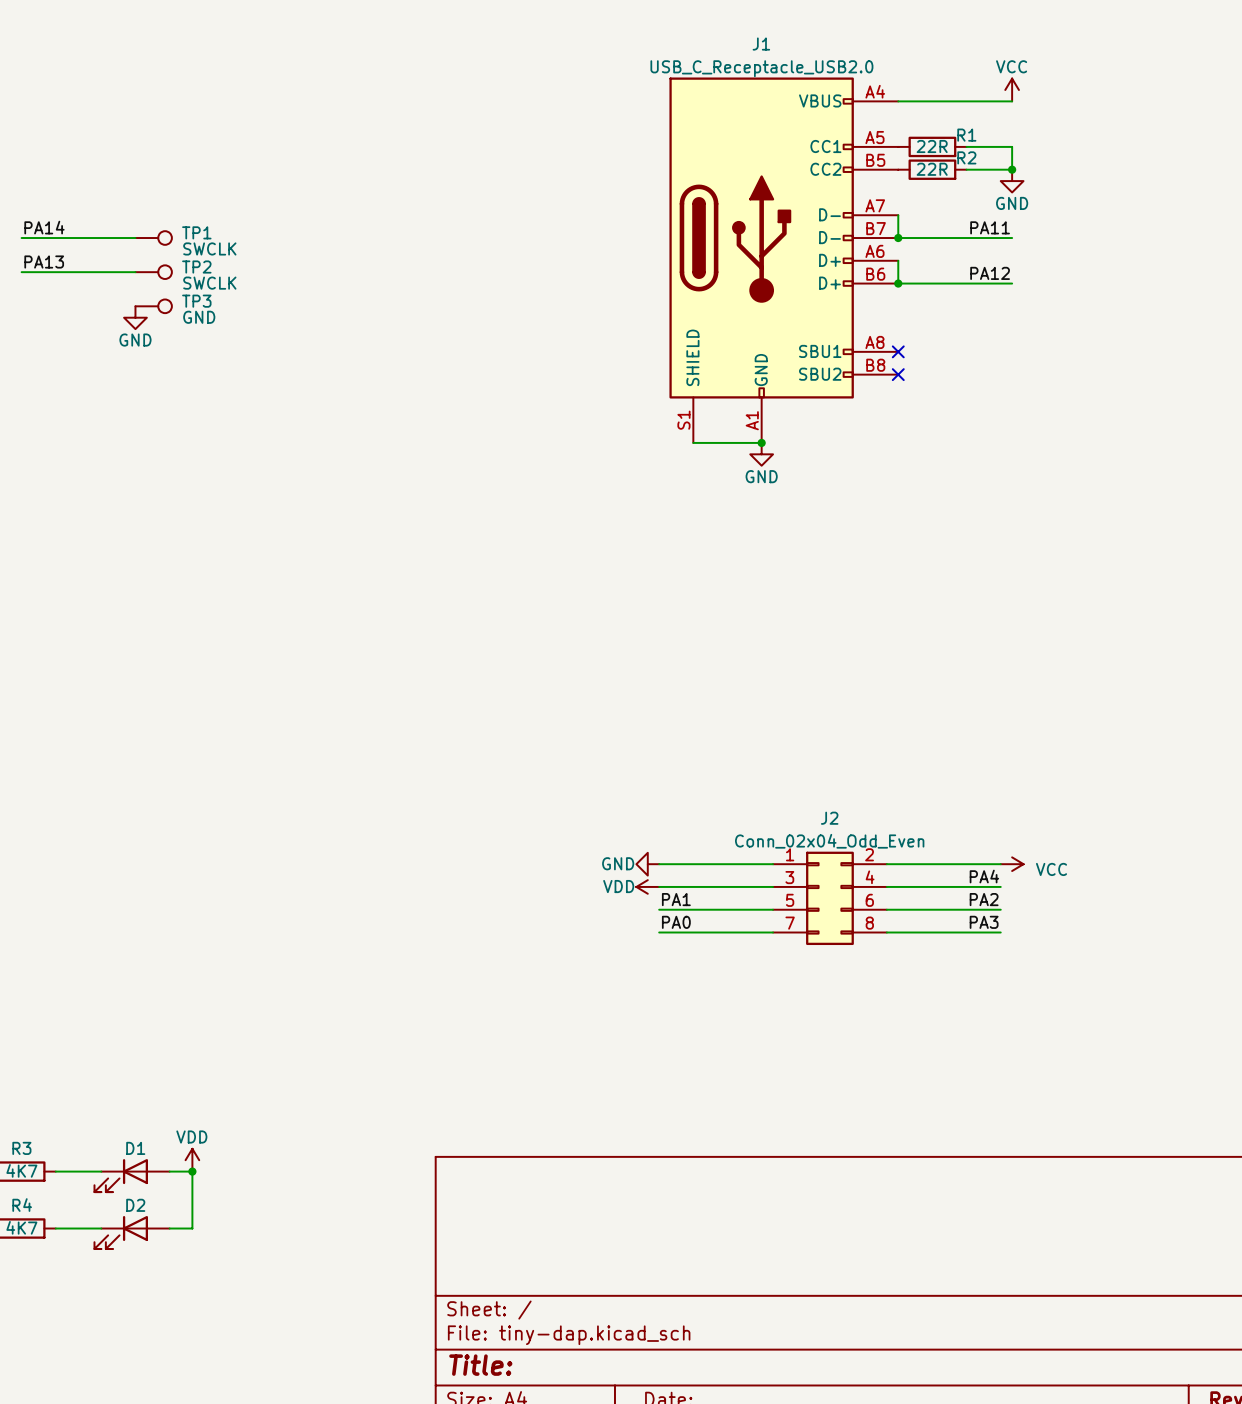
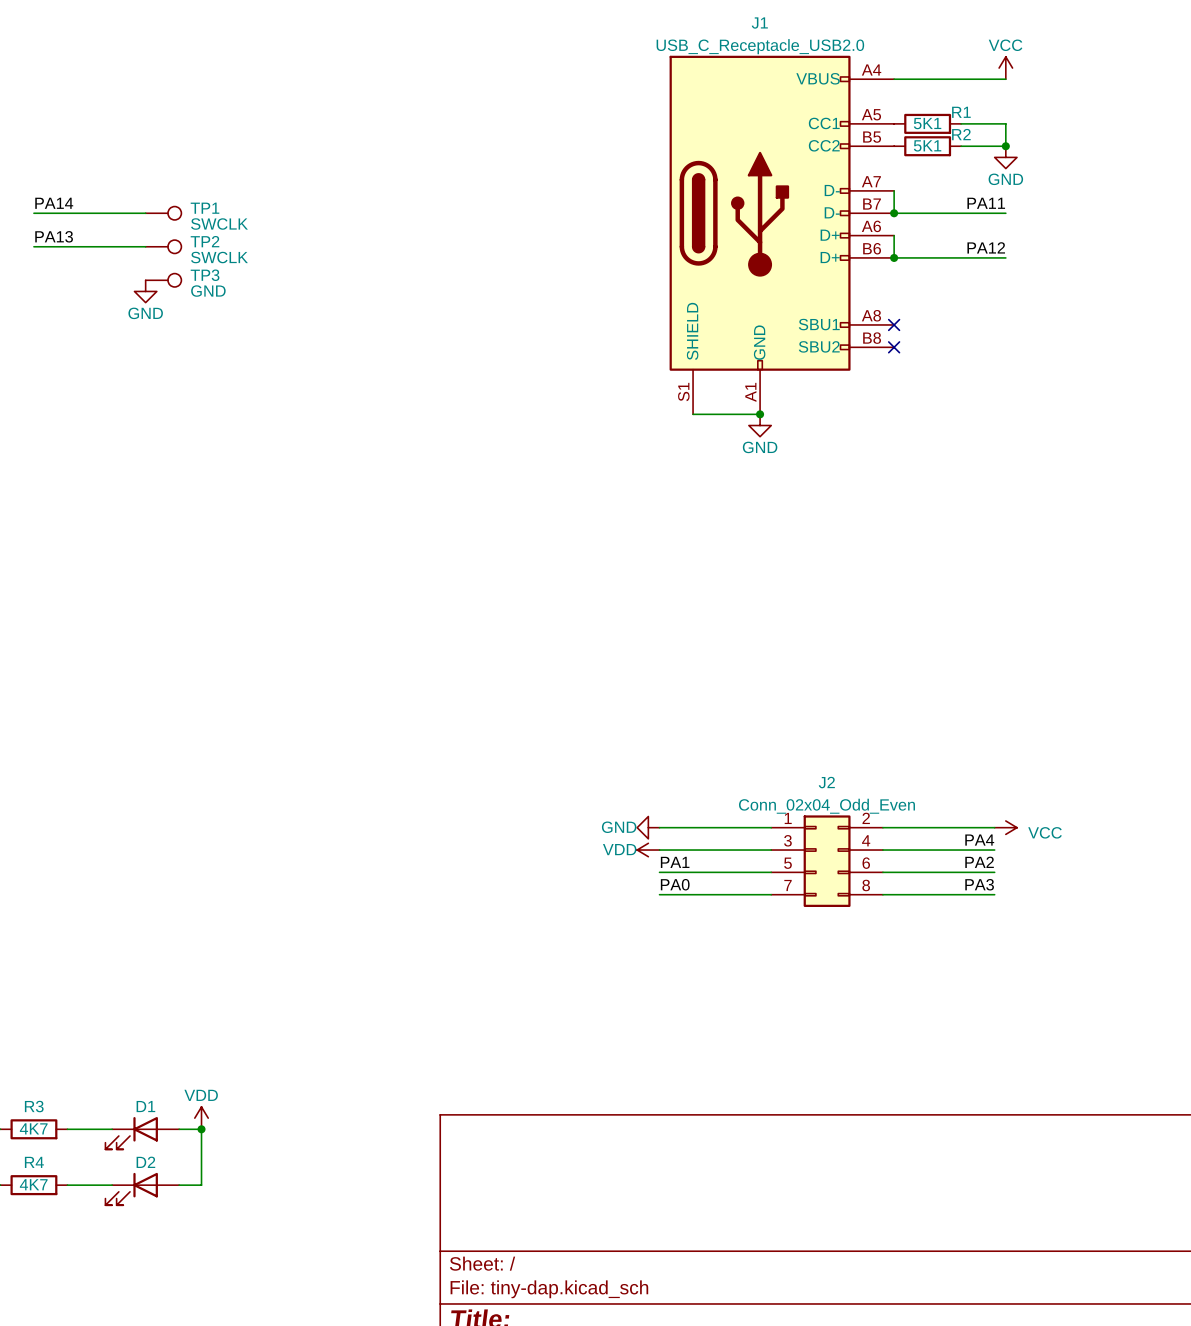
R1 value: 22R (932, 146) -> 5K1 (927, 123)
R2 value: 22R (932, 169) -> 5K1 (927, 145)

